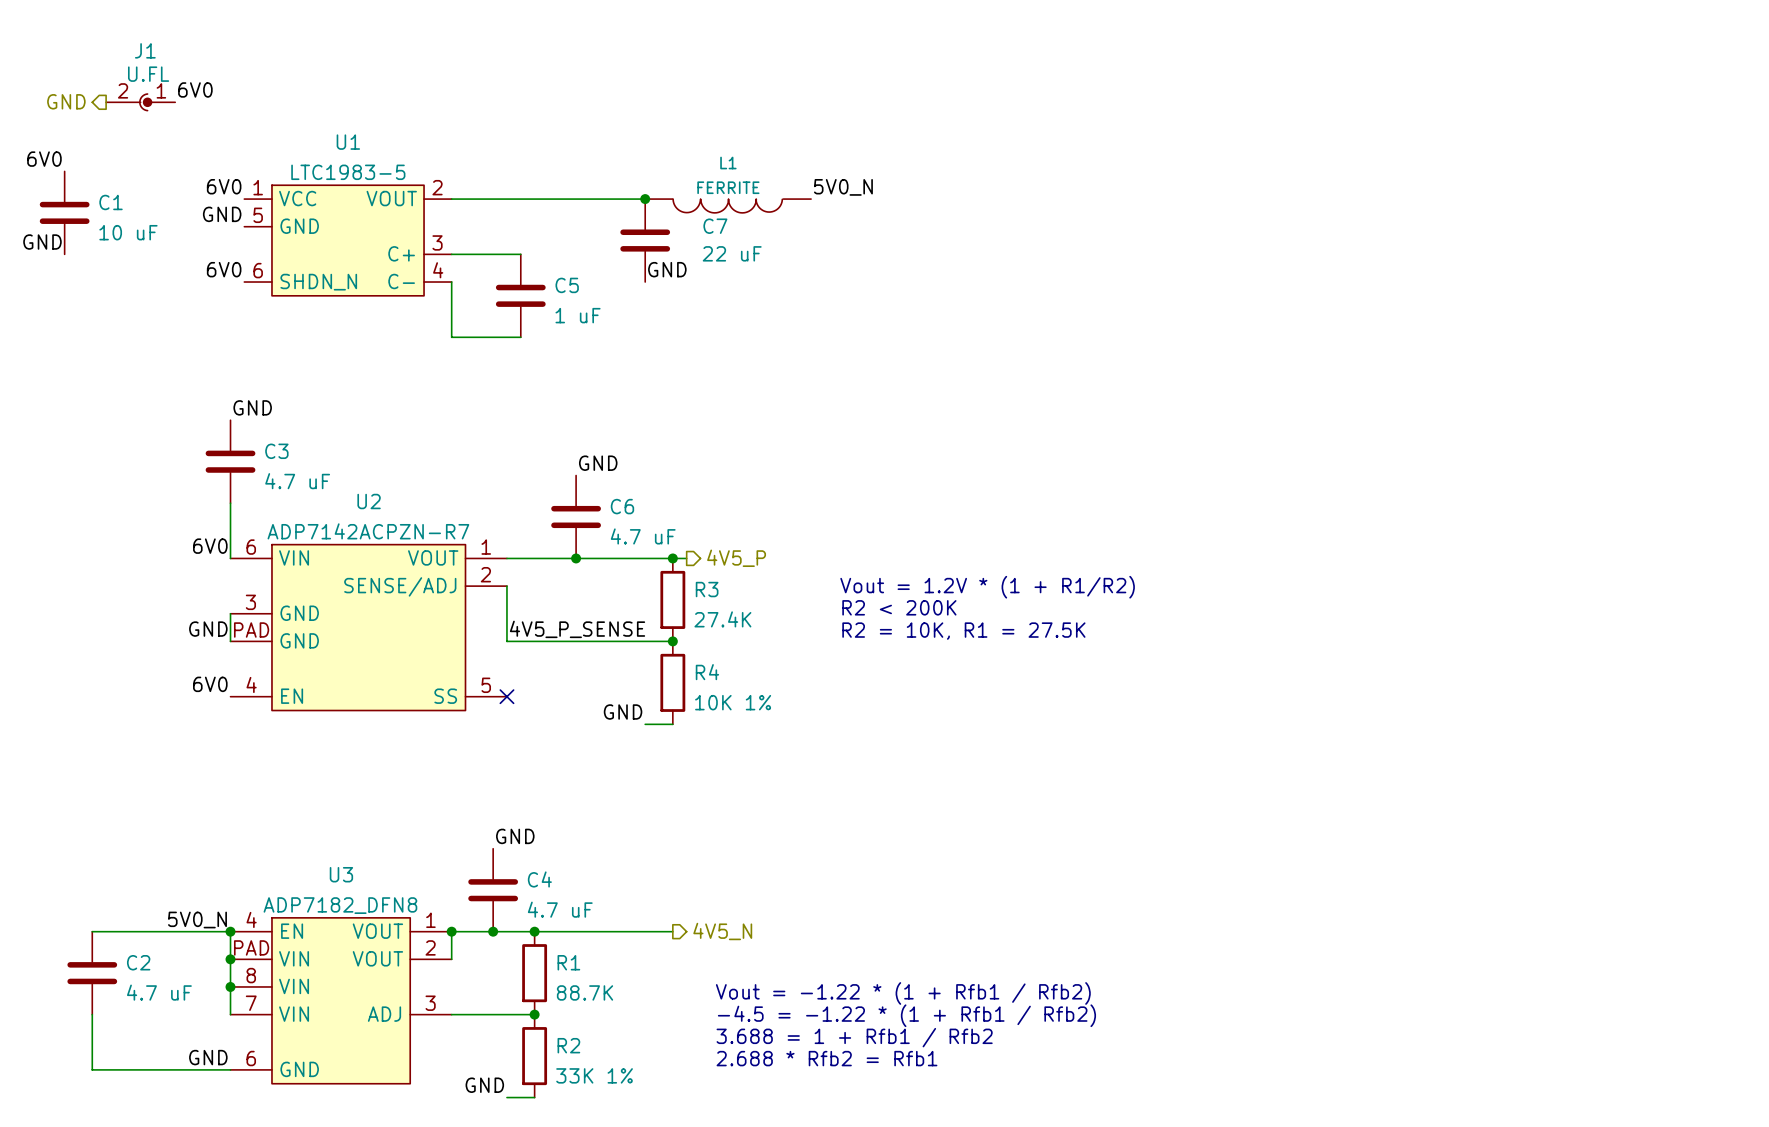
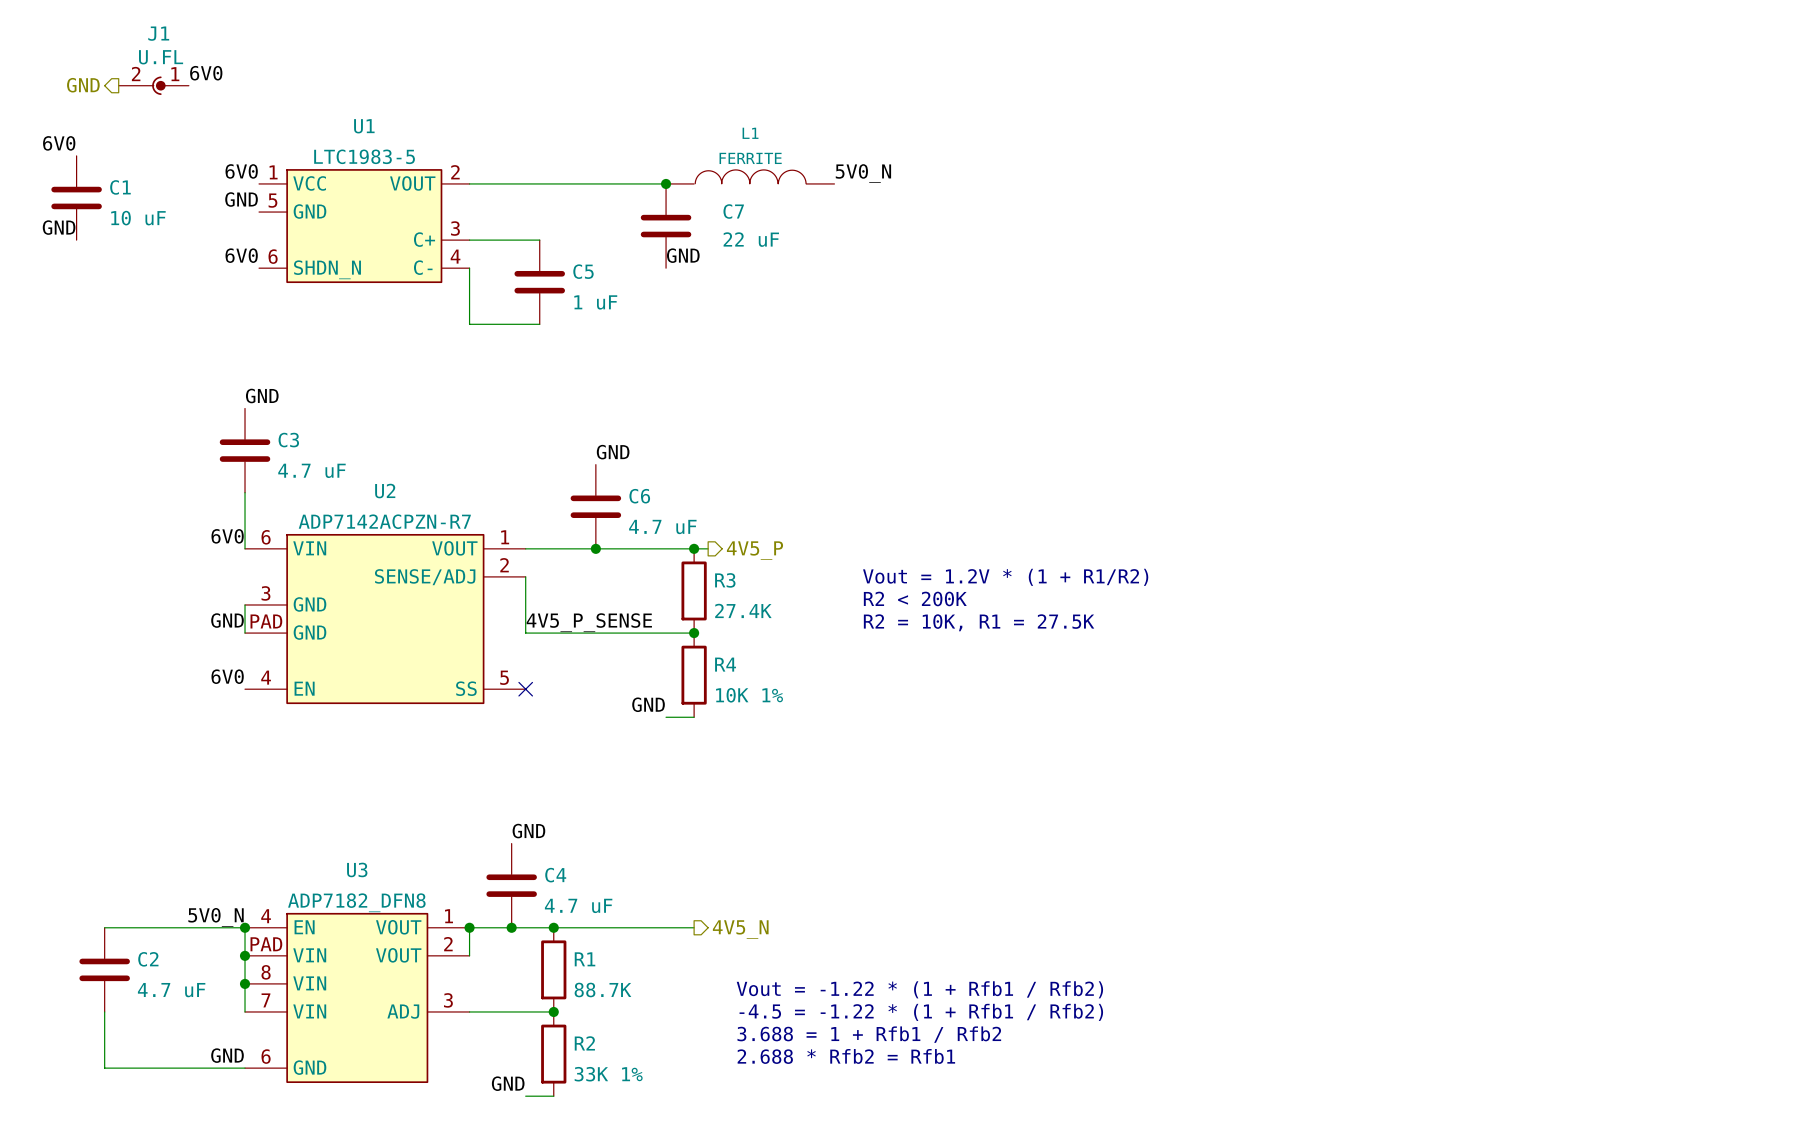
L1 rotation: 0° (727, 206) -> 180° (750, 176)

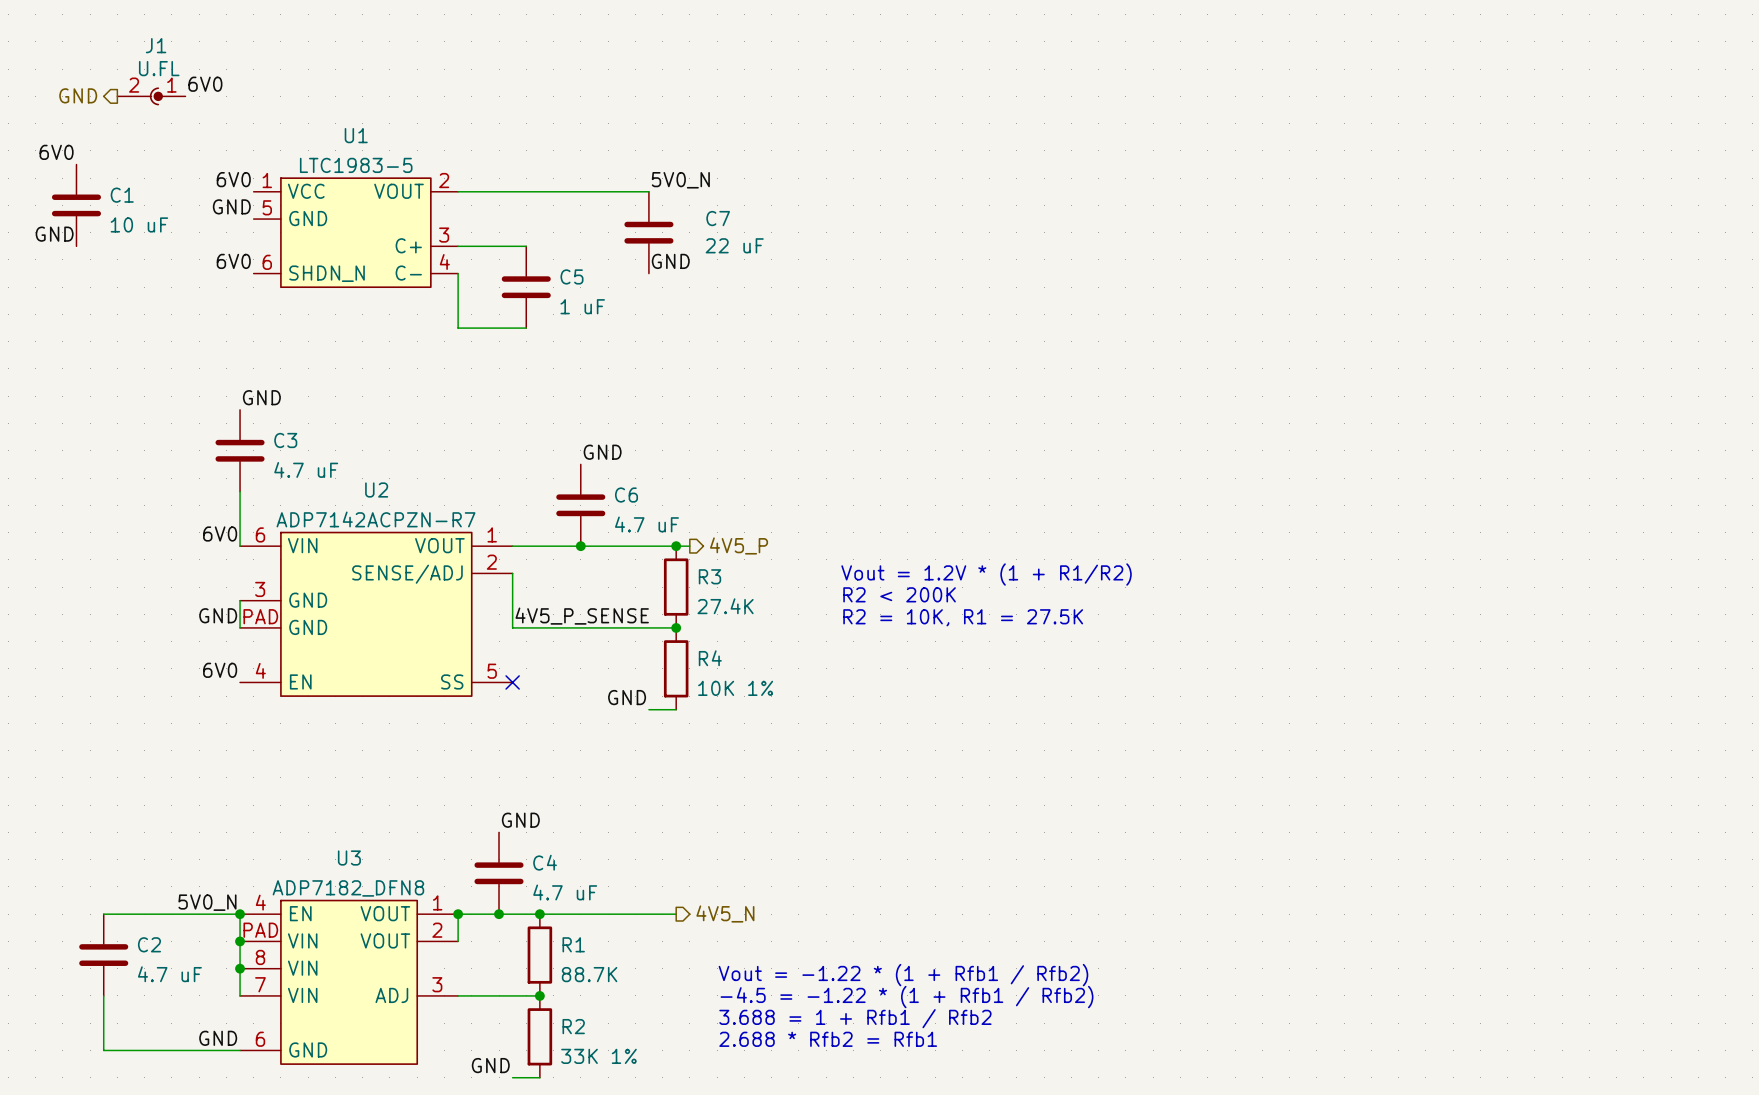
label position: 5V0_N (863, 173) -> 5V0_N (680, 180)
L1: FERRITE (750, 176) -> none
junction: (666, 183) -> none

